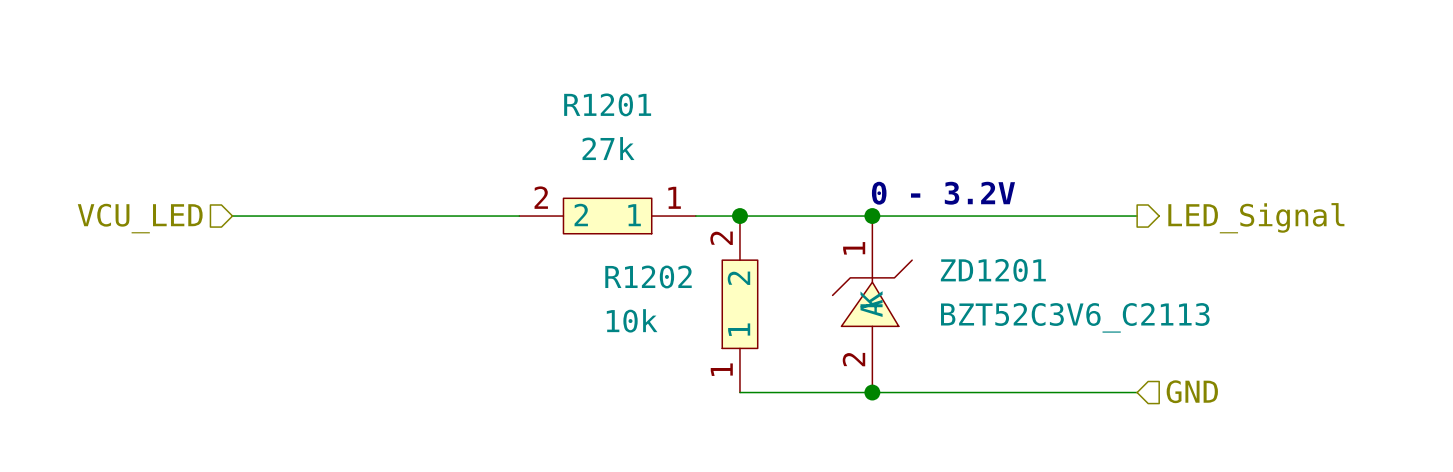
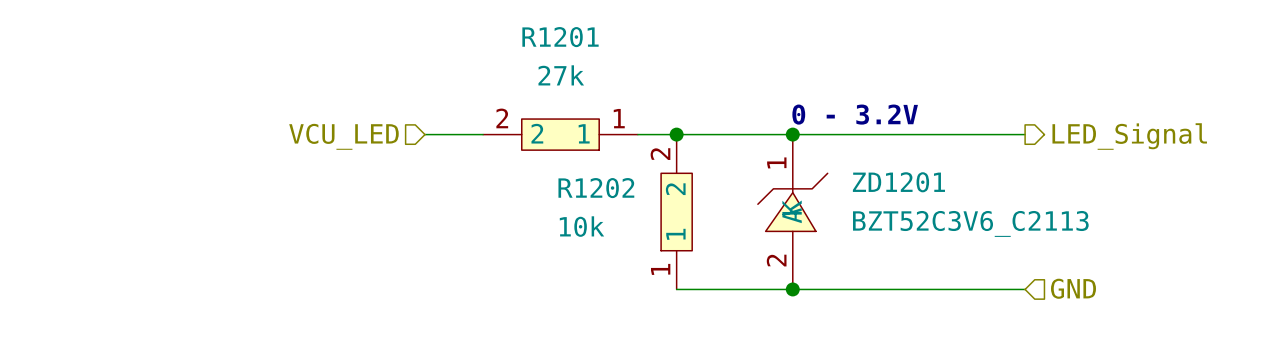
wire: (232, 216) (453, 216) -> none
hierarchical label position: VCU_LED (140, 218) -> VCU_LED (343, 136)

